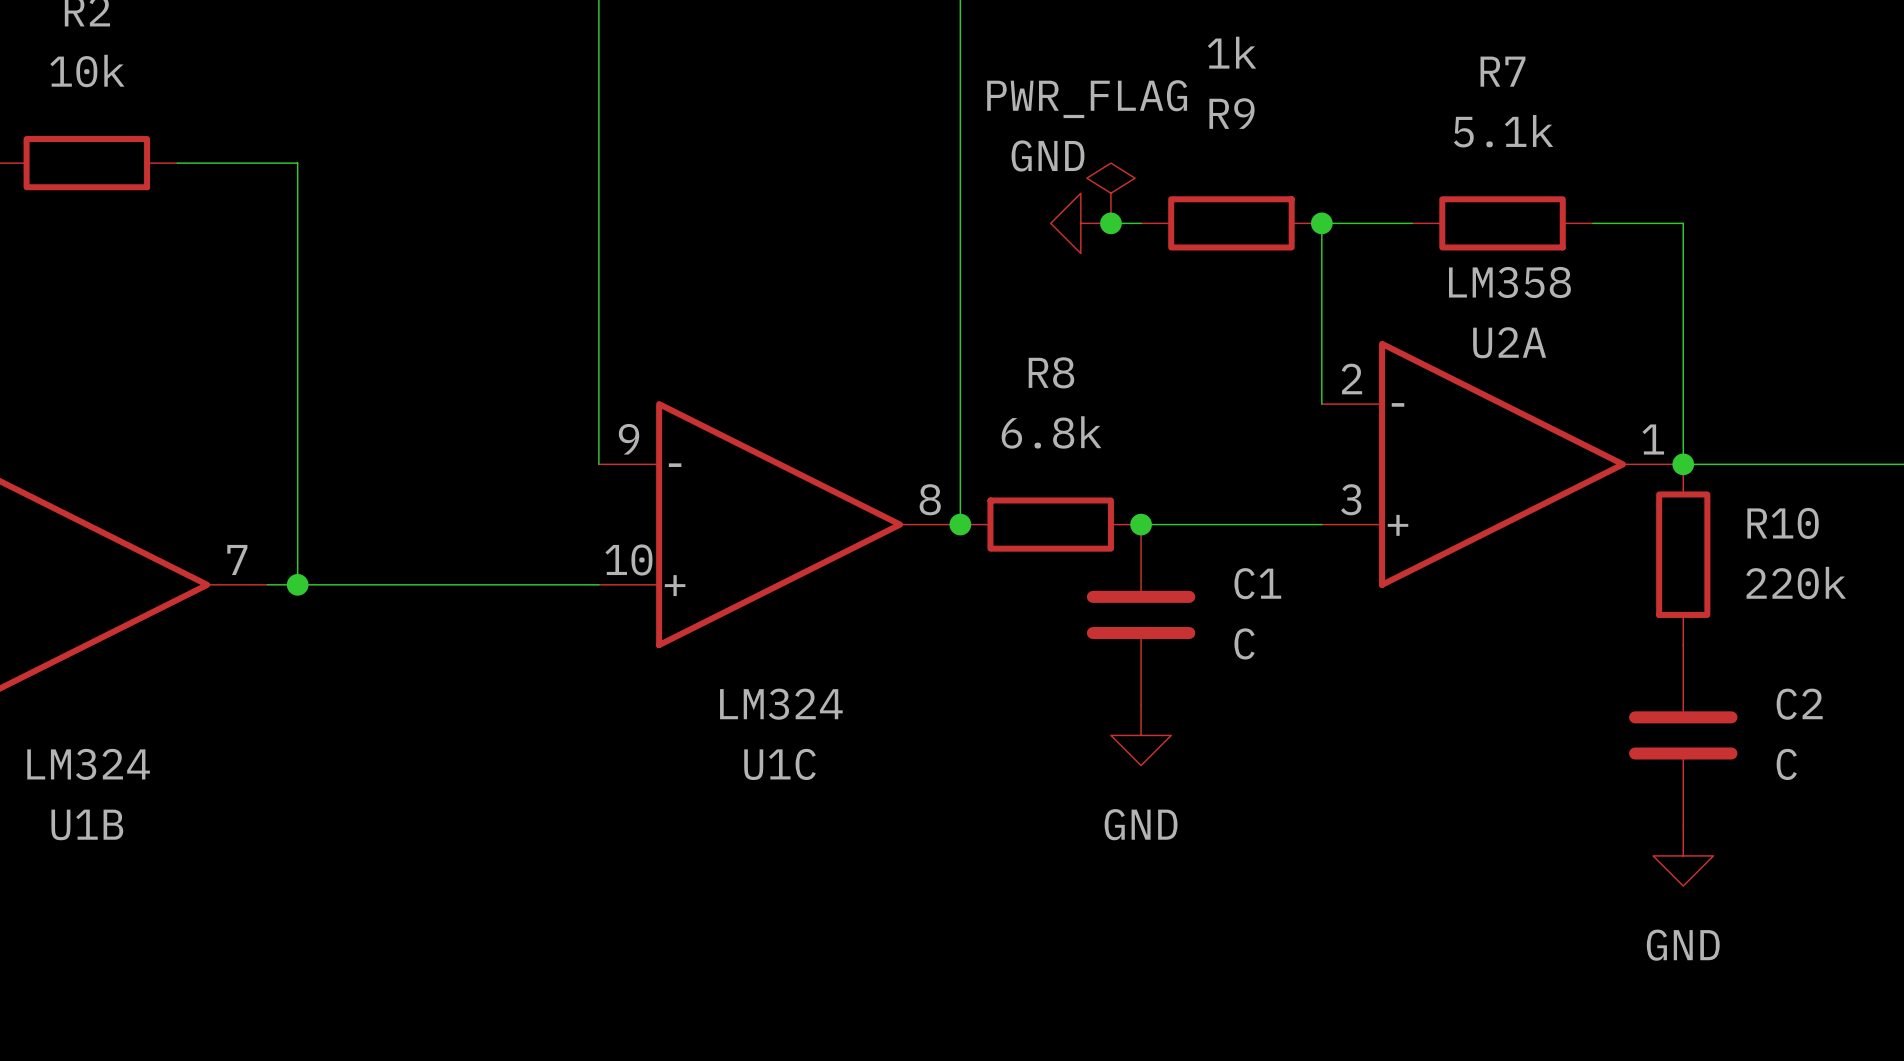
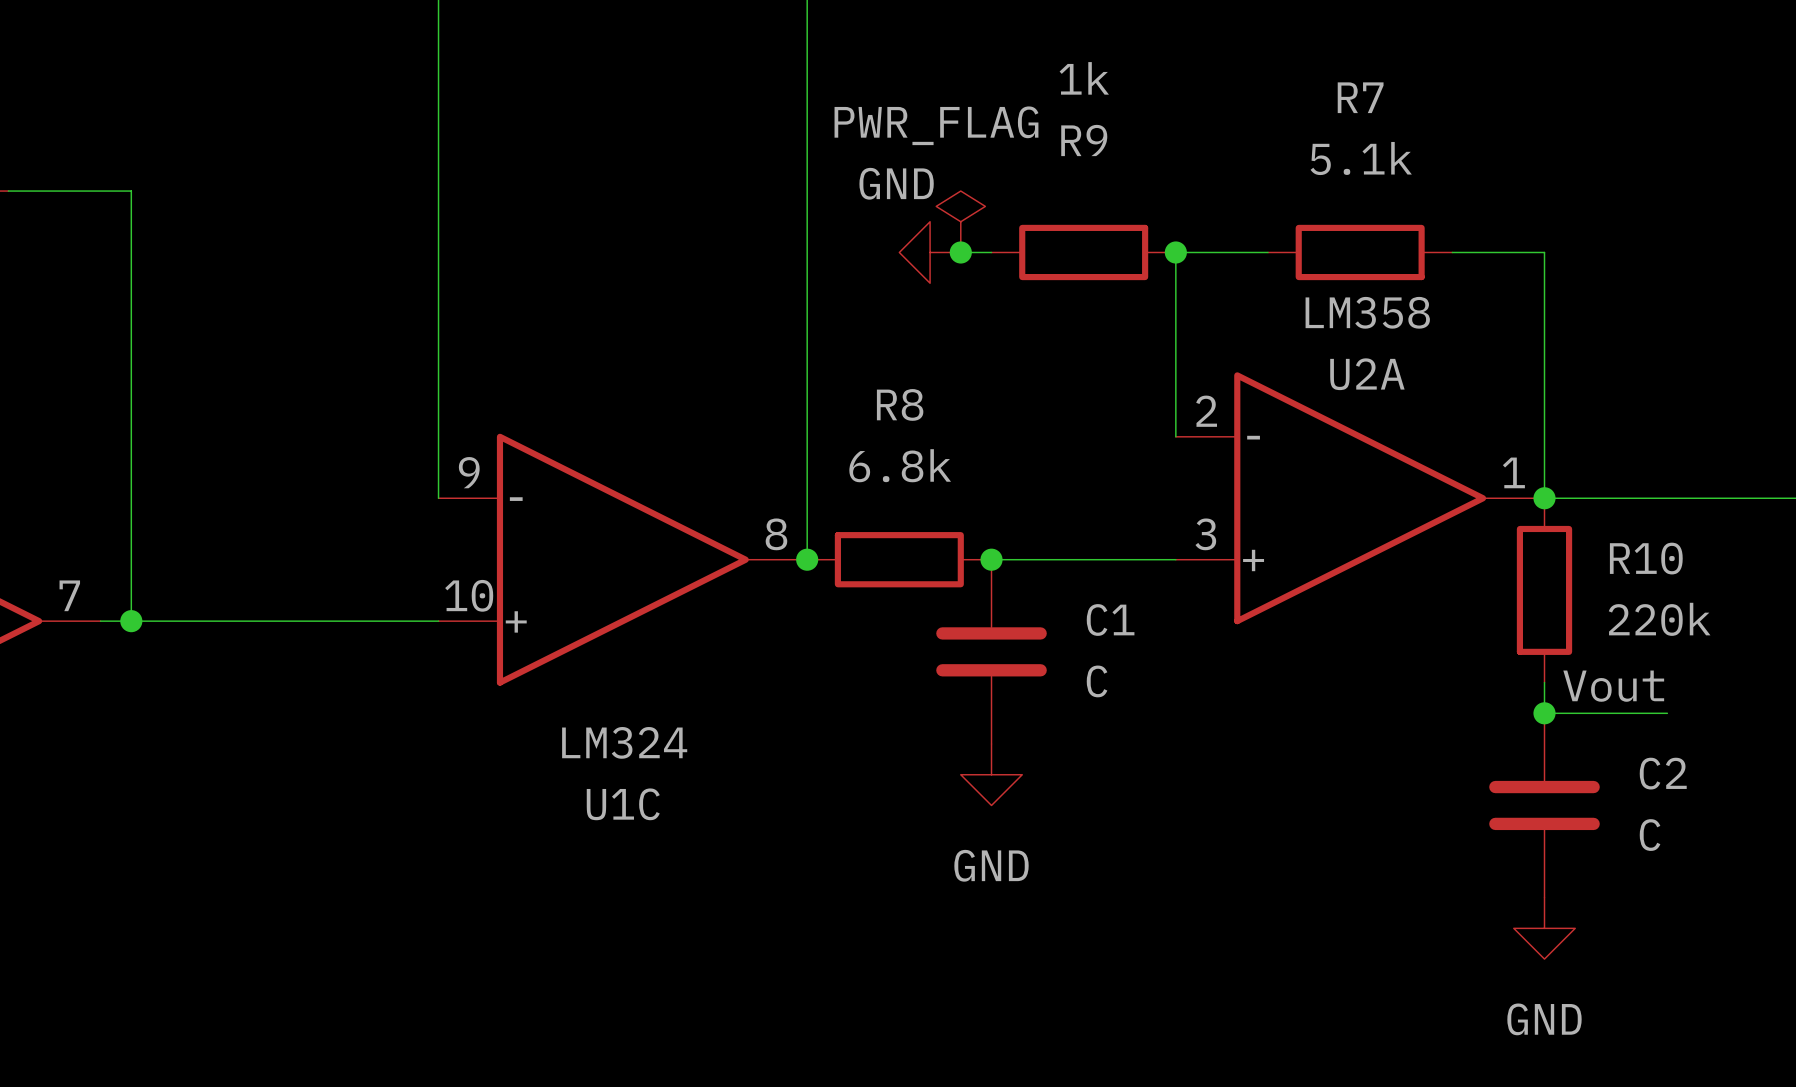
wire: none -> (1544, 682) (1544, 713) (1667, 713)
label: none -> Vout (1613, 686)
junction: none -> (1544, 713)
C2 position: (1683, 735) -> (1544, 805)
power symbol position: GND (1683, 855) -> GND (1544, 928)

